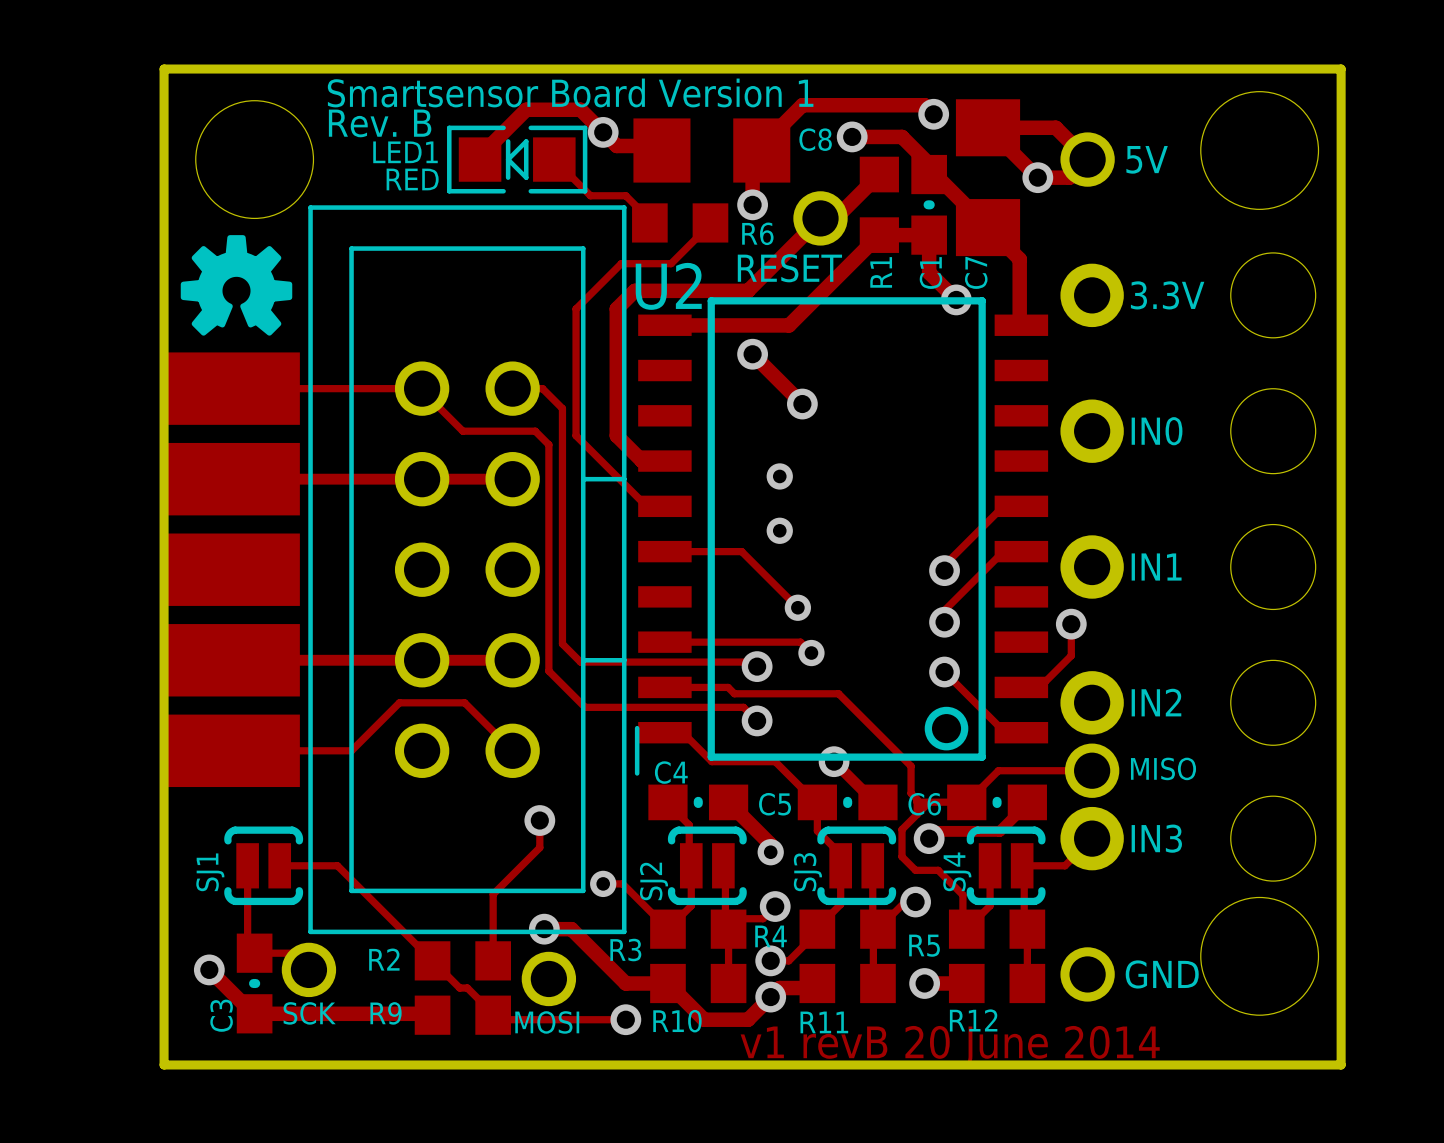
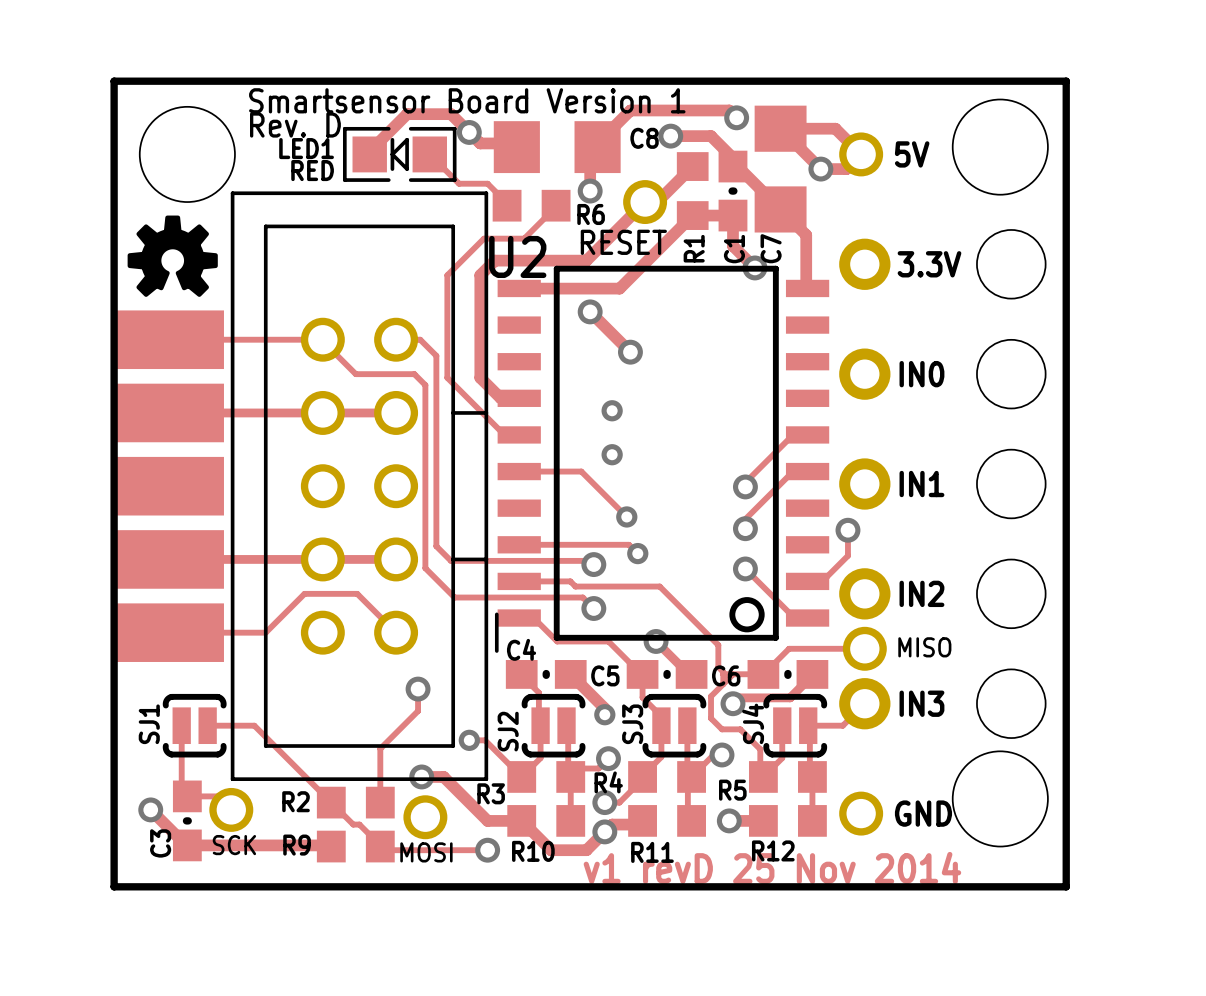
text: Rev. B (380, 123) -> Rev. D (295, 124)
text: v1 revB 20 June 2014 (950, 1046) -> v1 revD 25 Nov 2014 (772, 867)

